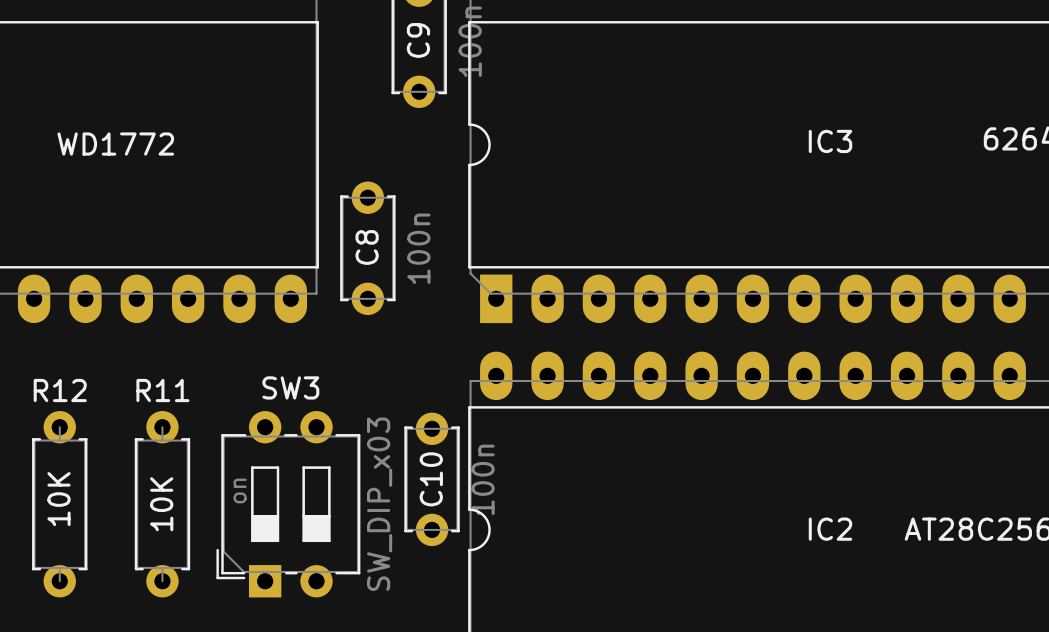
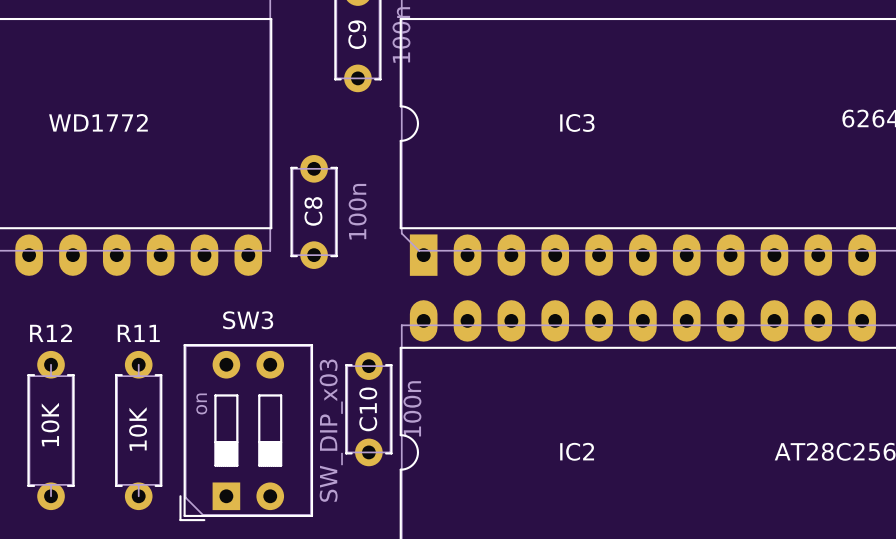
IC3 name position: IC3 (830, 141) -> IC3 (577, 122)
SW3 footprint: [216, 411, 361, 598] -> [179, 344, 314, 522]
IC2 name position: IC2 (830, 529) -> IC2 (577, 451)

